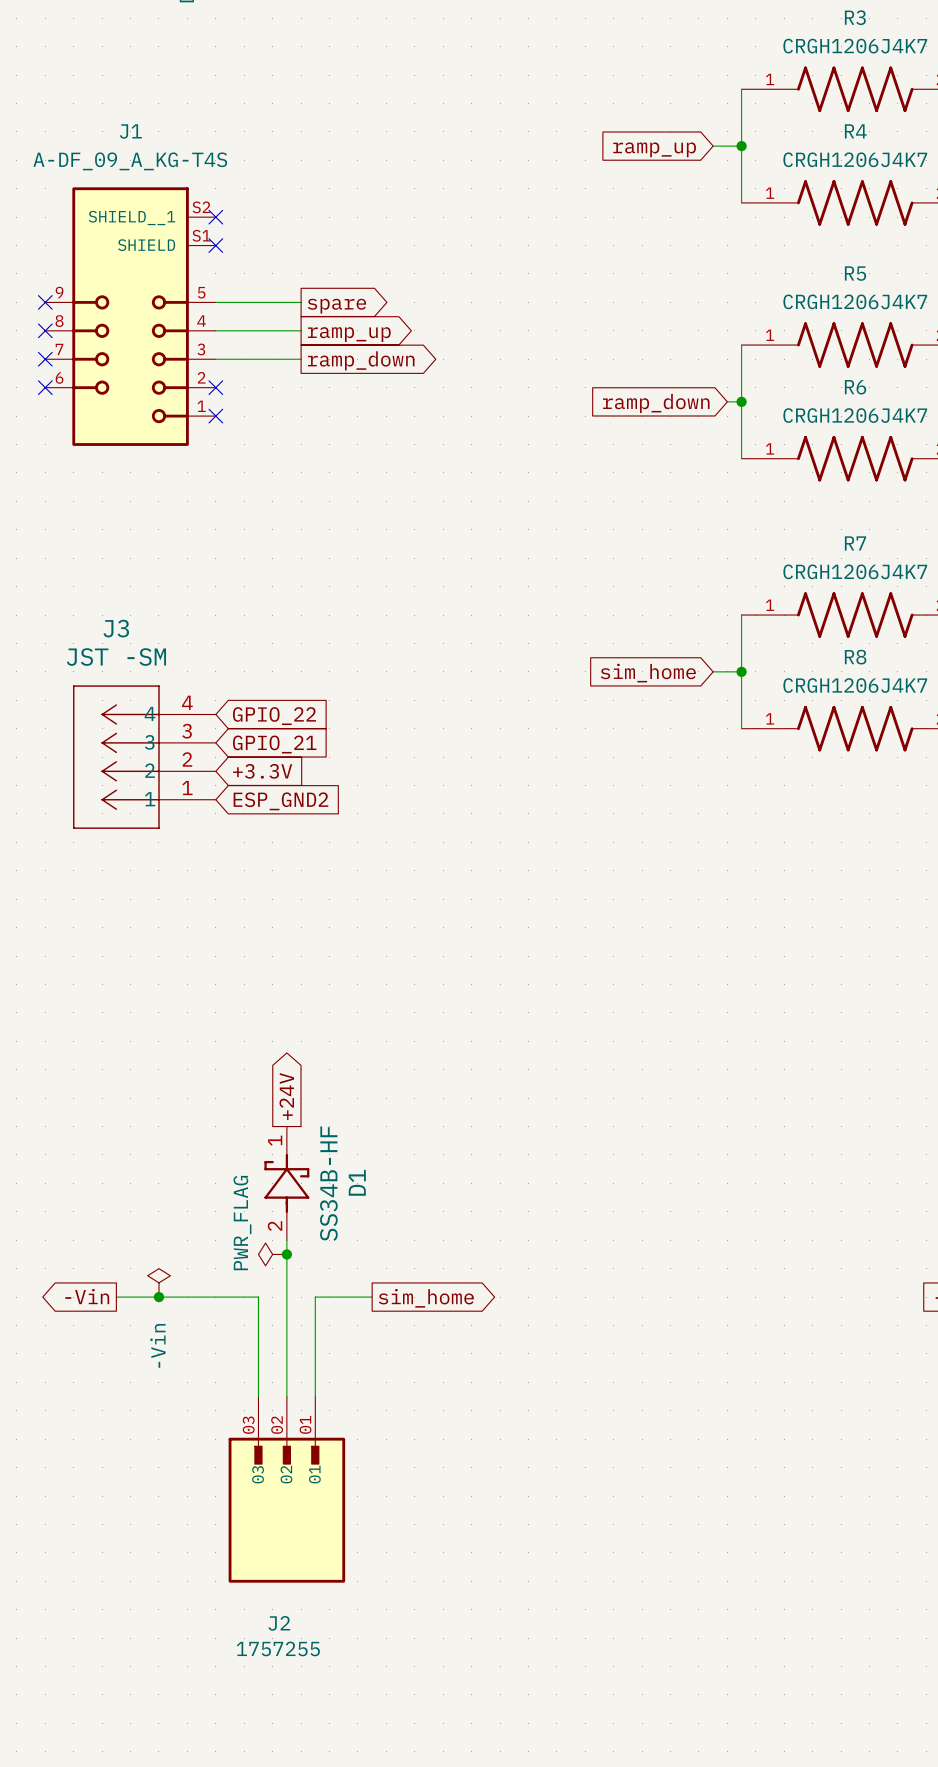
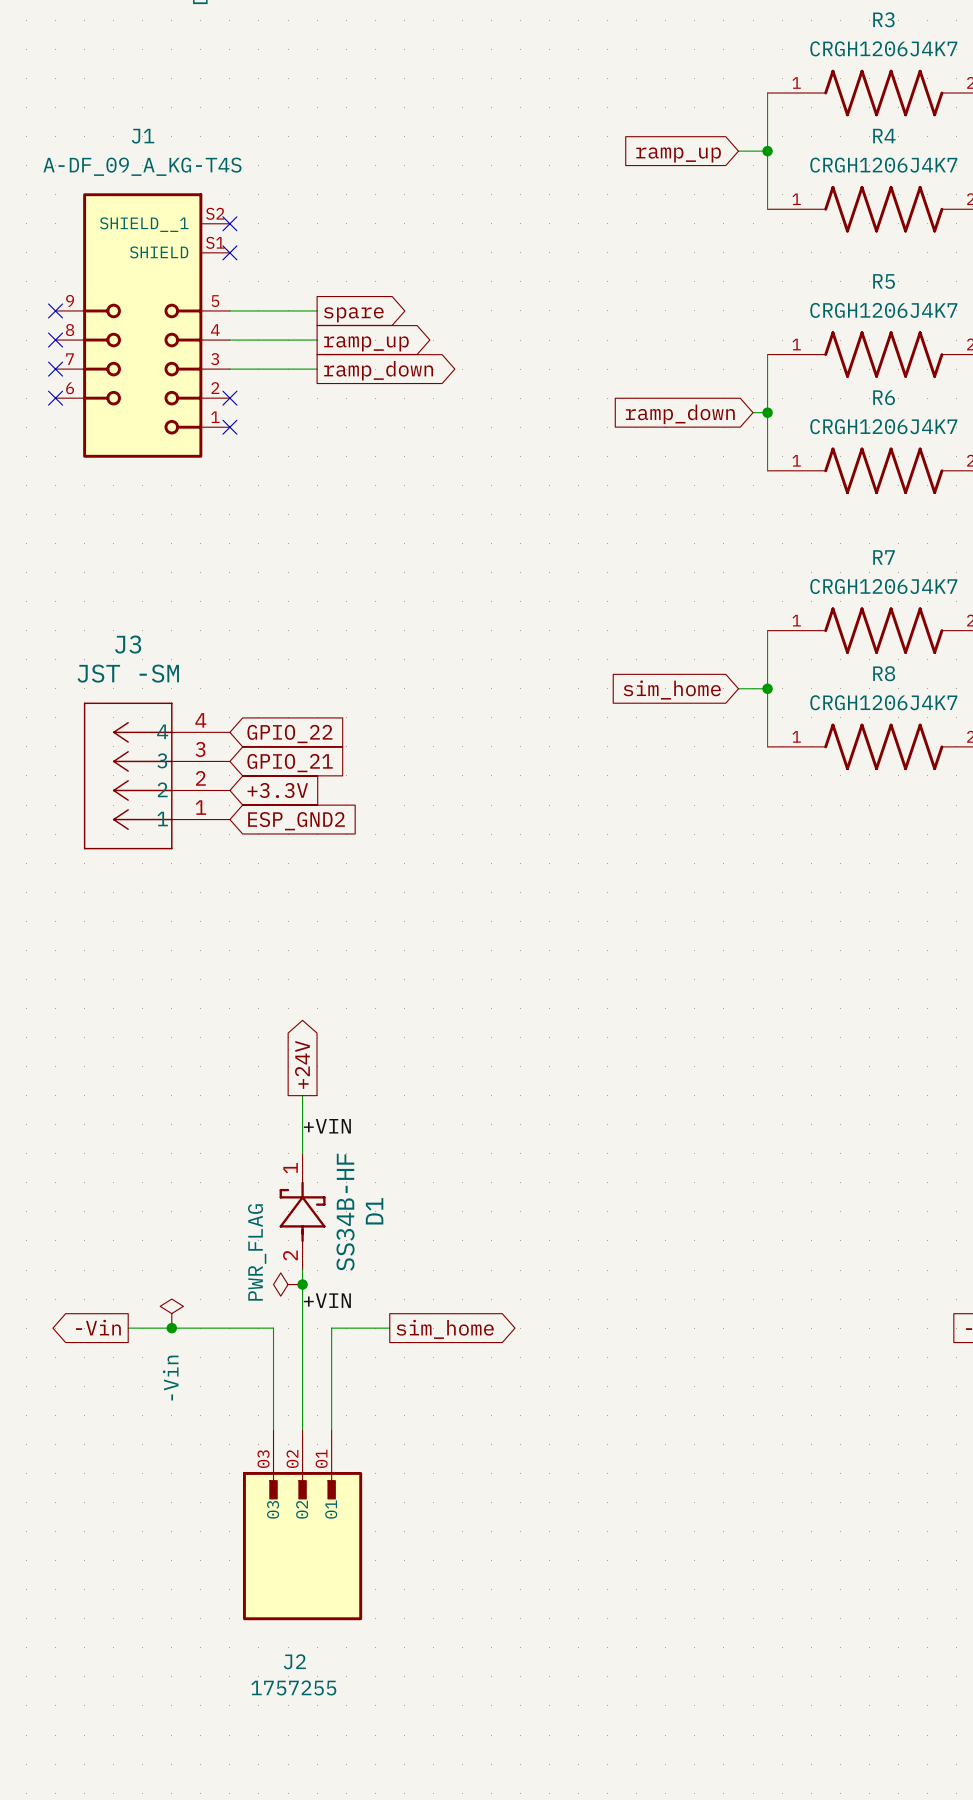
wire: none -> (302, 1095) (302, 1153)
global label position: +24V (286, 1096) -> +24V (302, 1064)
label: none -> +VIN (327, 1126)
label: none -> +VIN (327, 1300)

